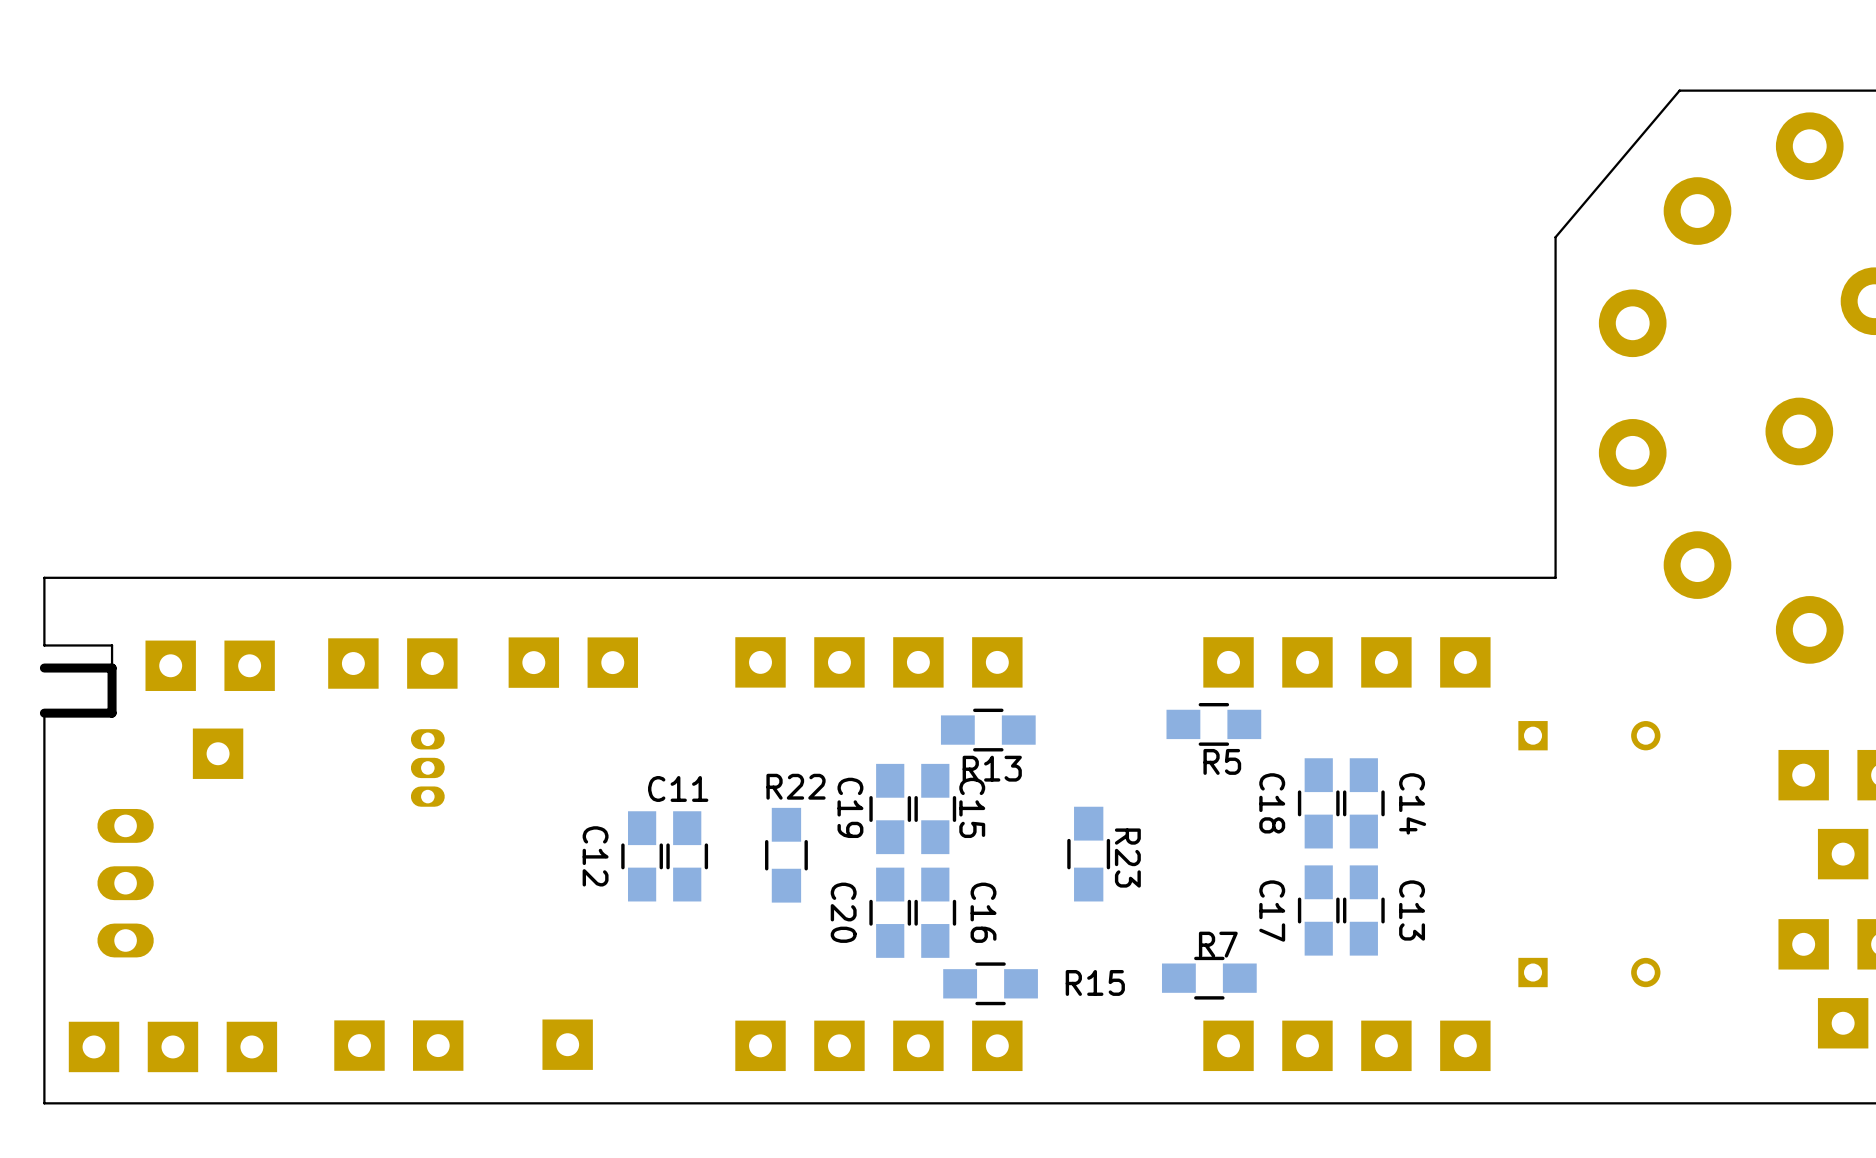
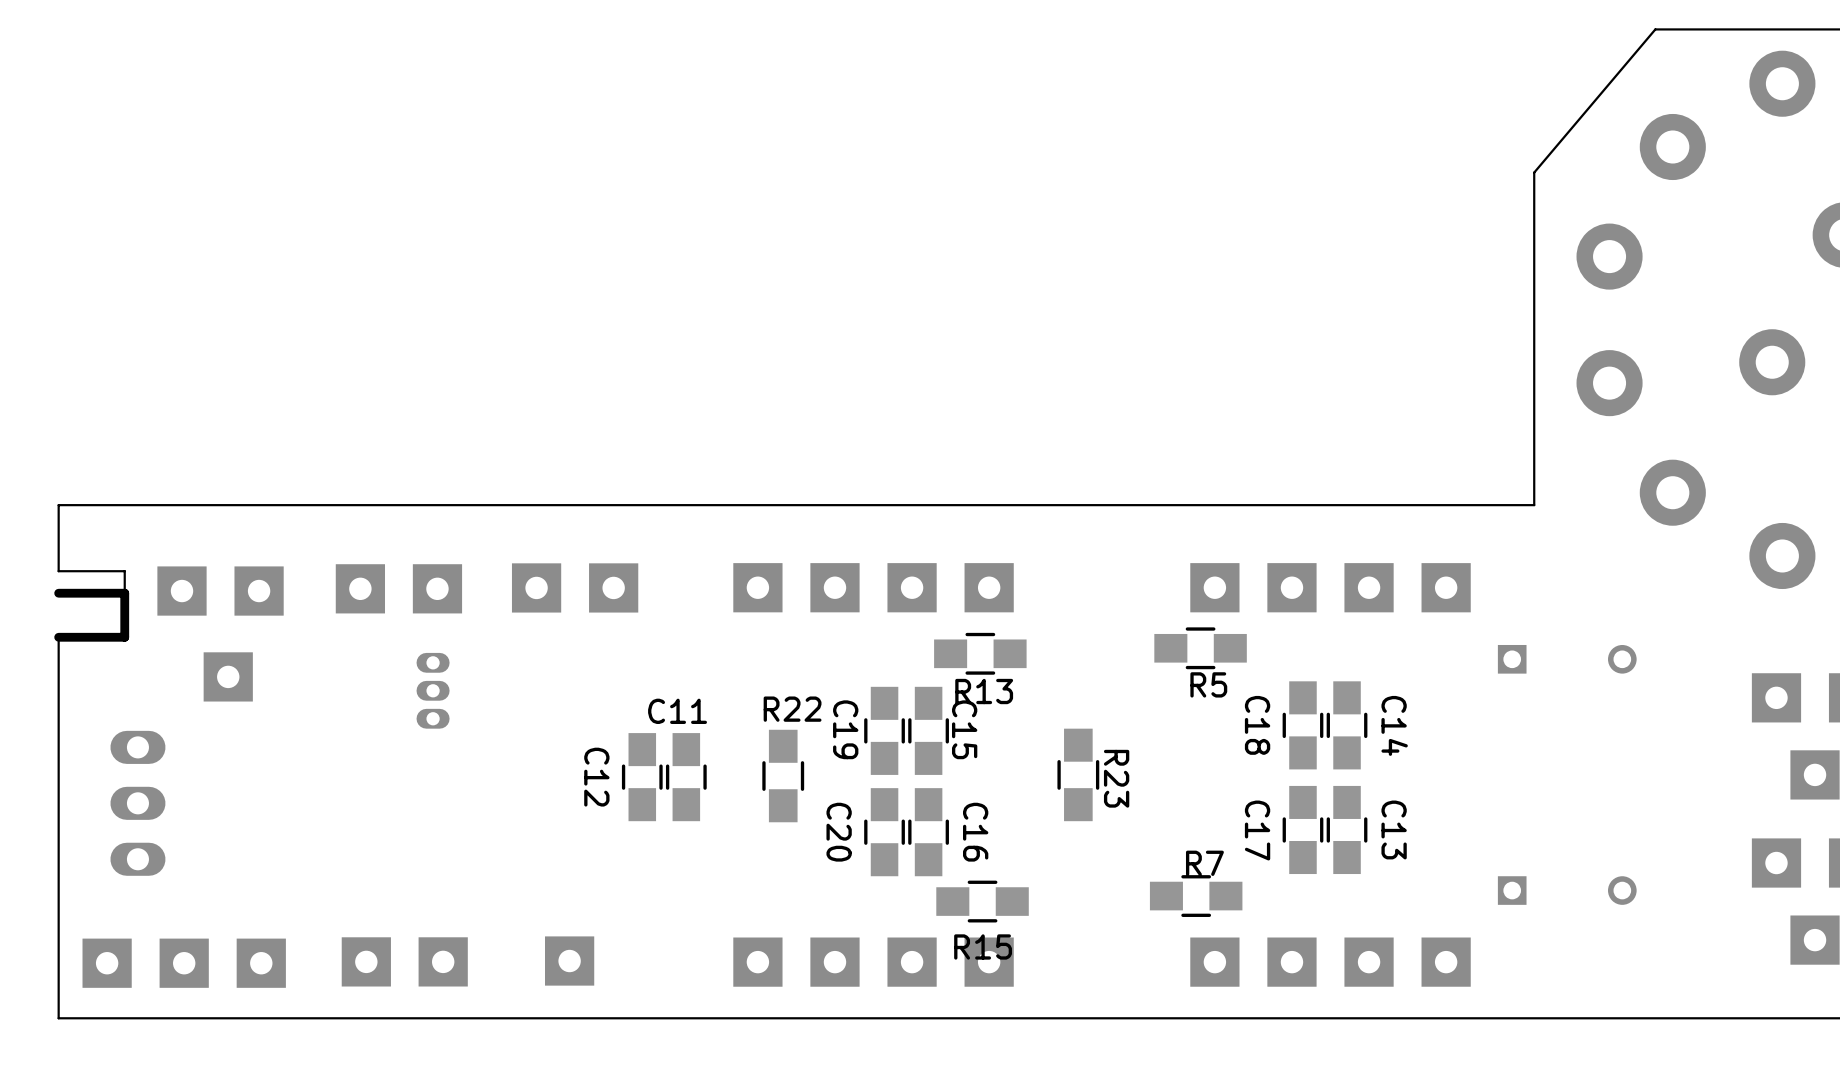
R15 name position: R15 (1095, 982) -> R15 (983, 946)

